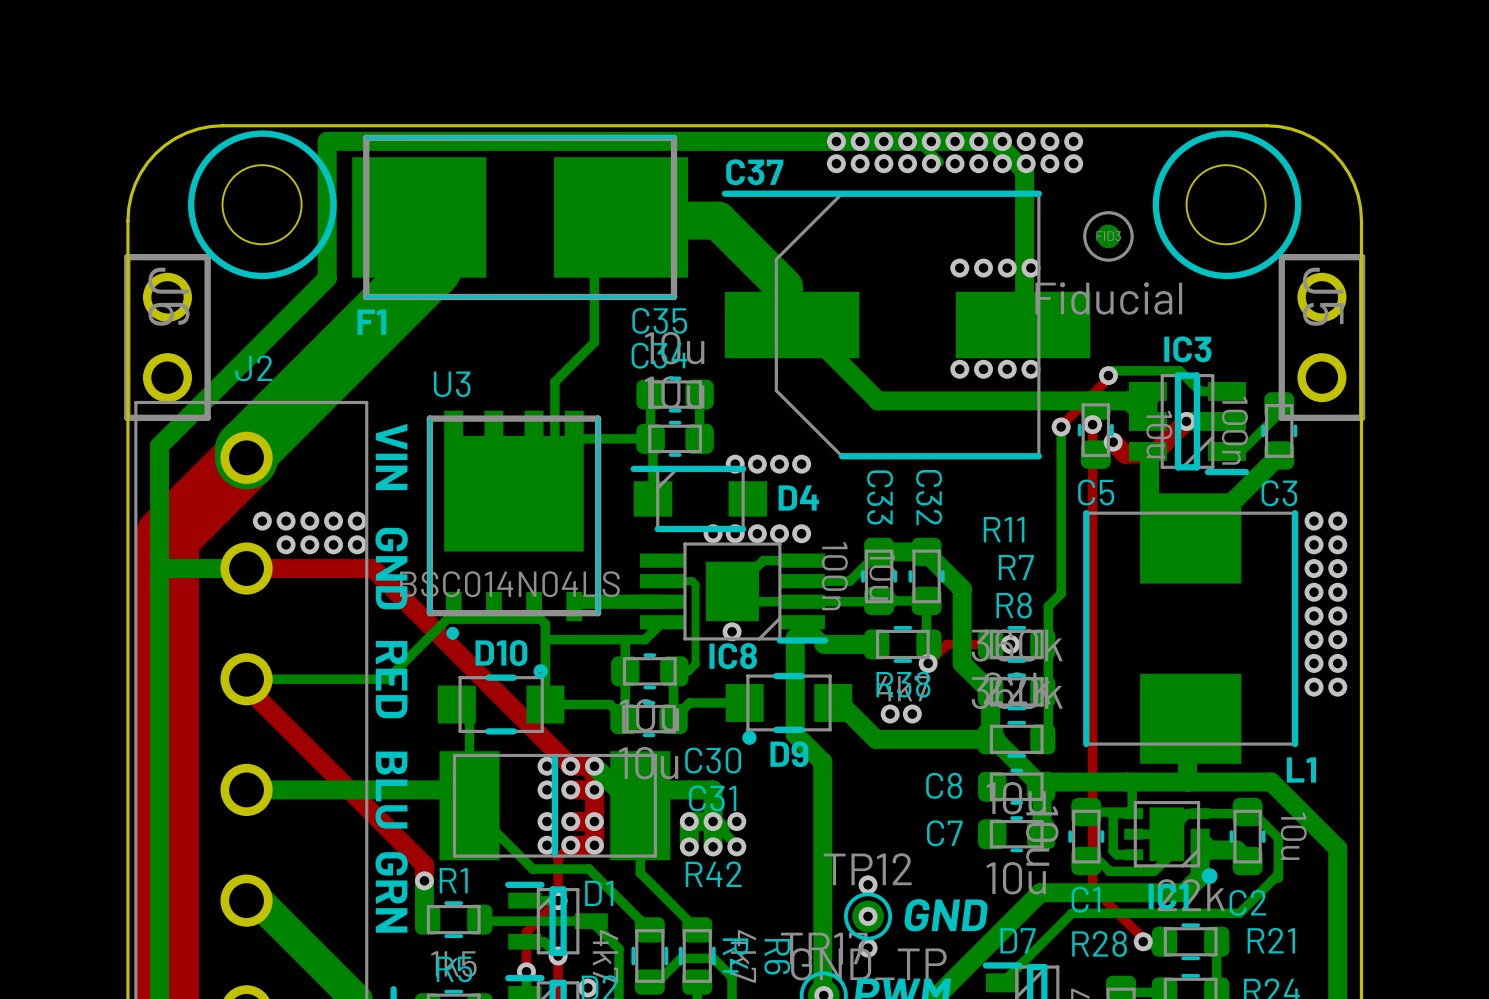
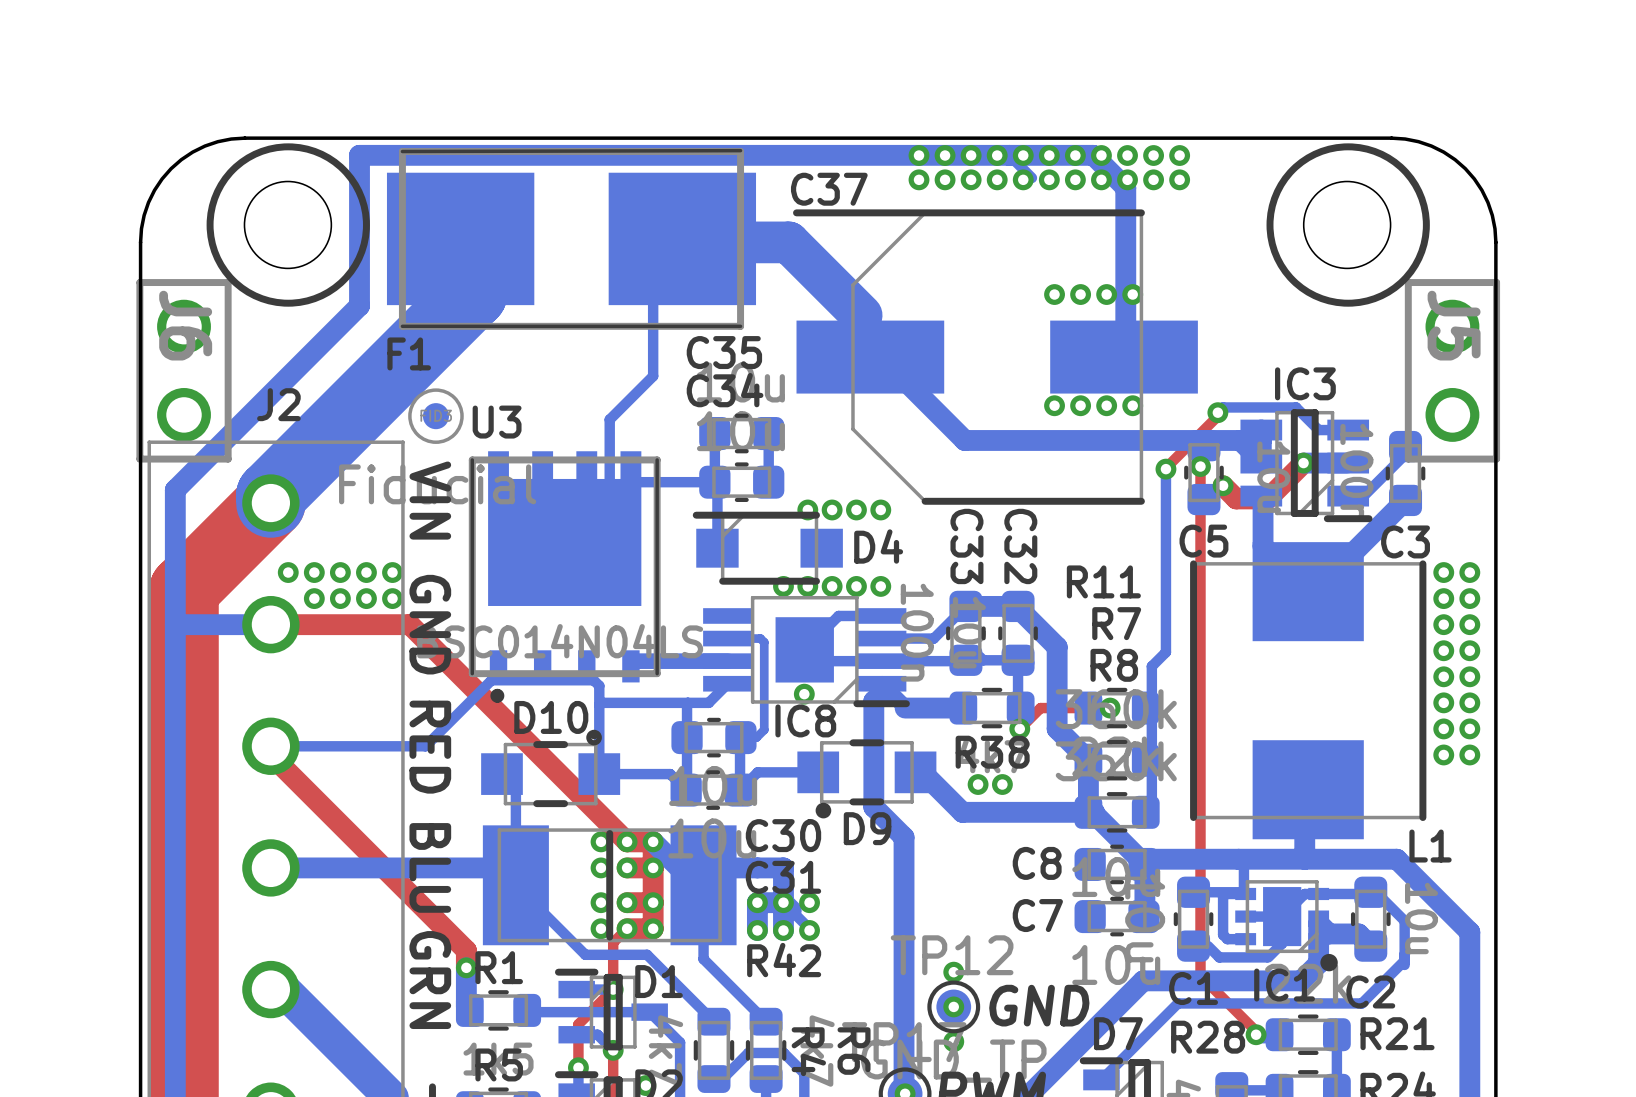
FID3 position: (1108, 236) -> (435, 416)

